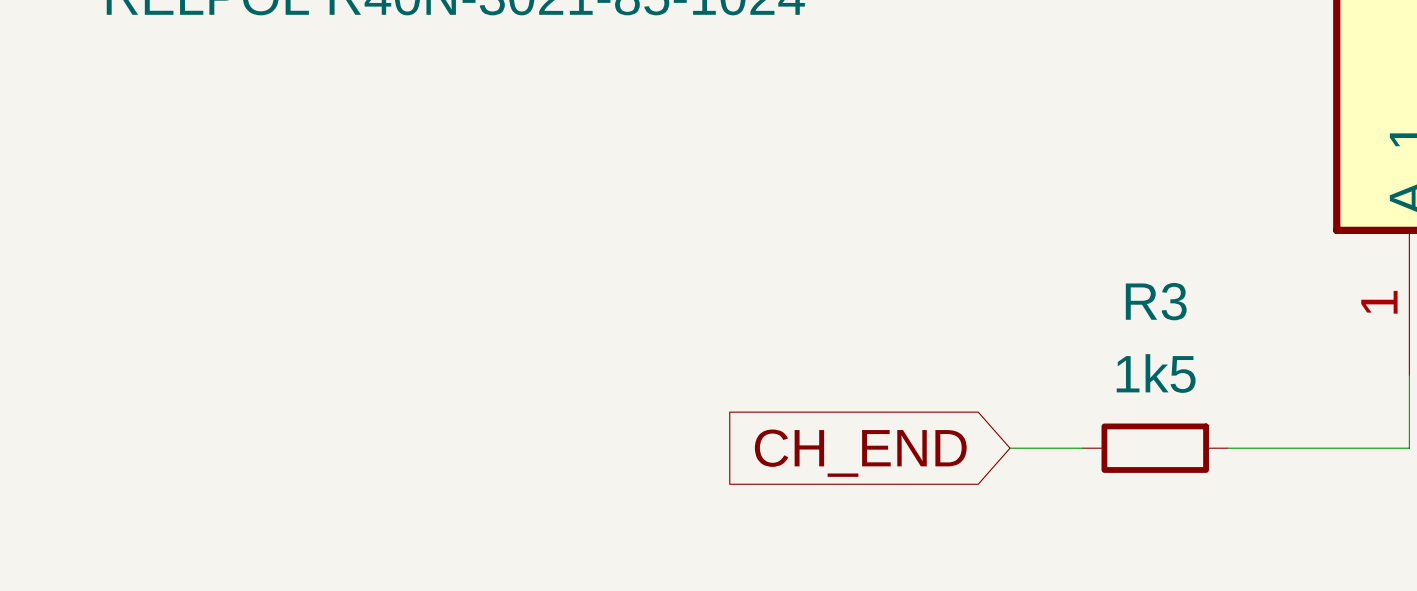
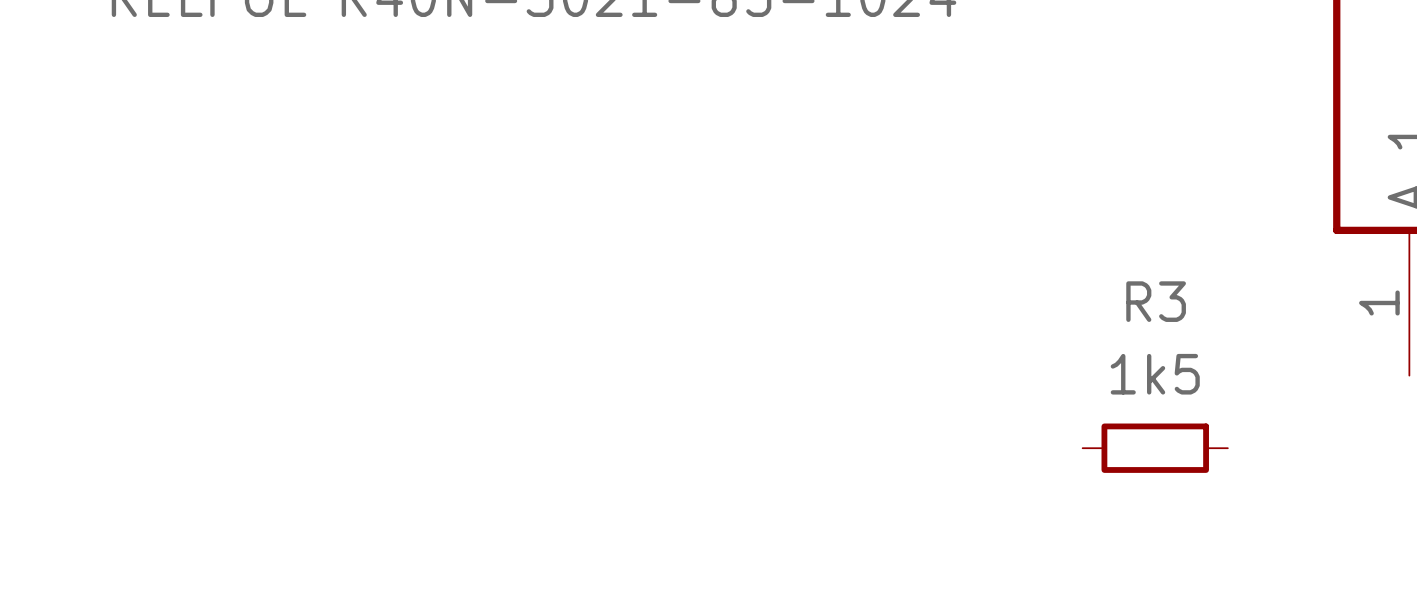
wire: (1409, 375) (1409, 448) (1227, 448) -> none
wire: (1010, 448) (1082, 448) -> none
global label: CH_END (860, 453) -> none

